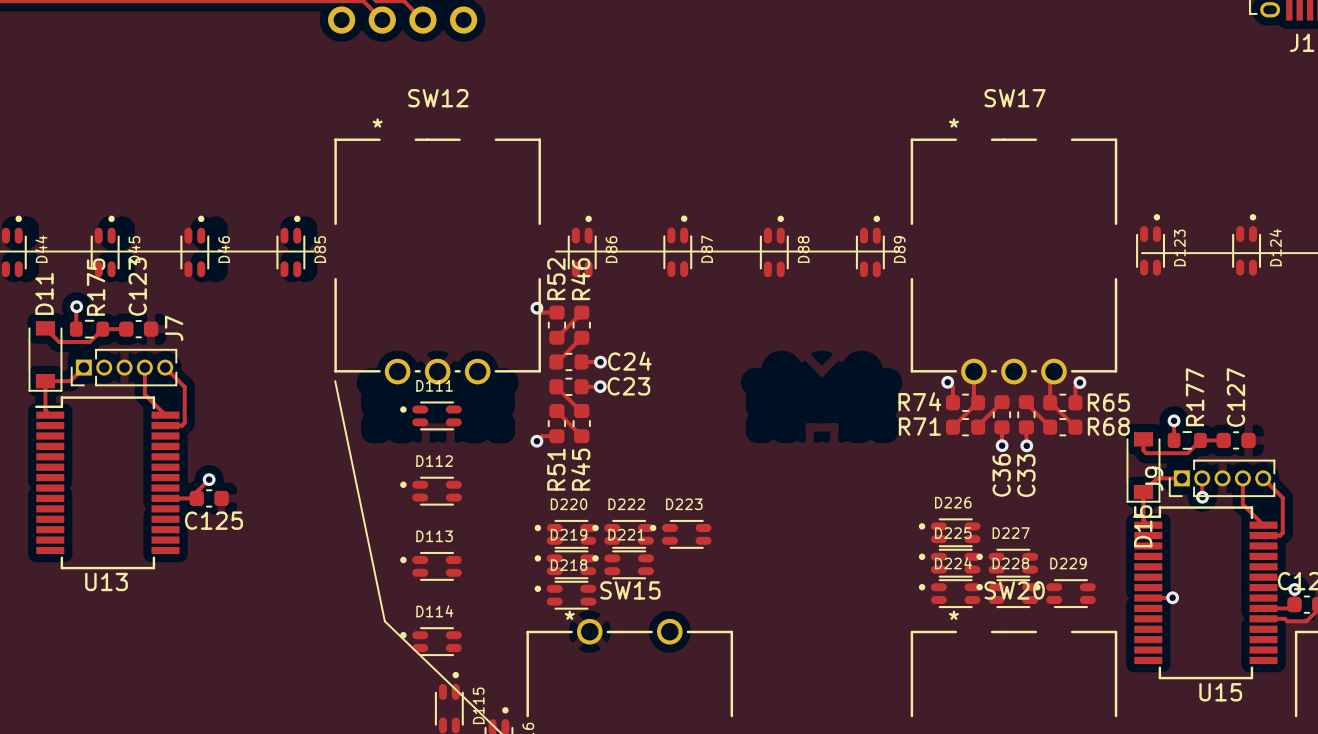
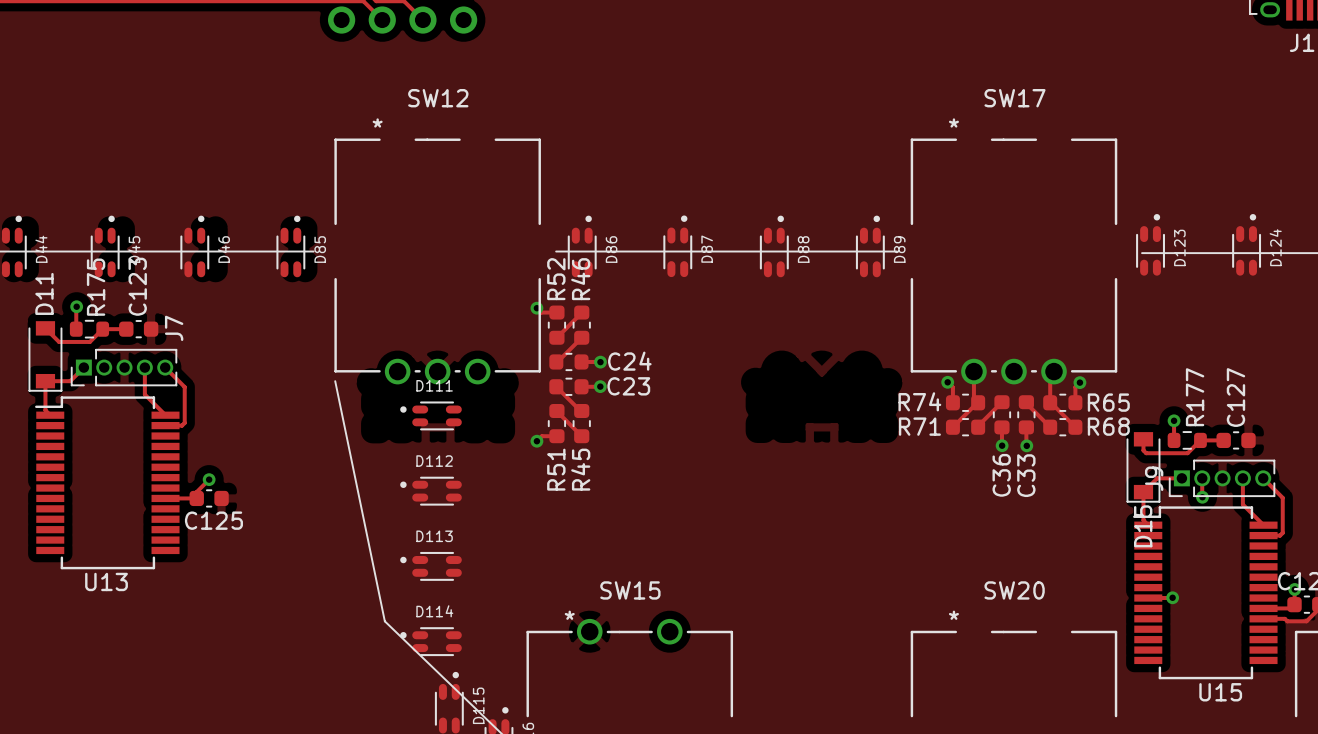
D226: (949, 532) -> none
D220: (565, 534) -> none
D222: (623, 534) -> none
D223: (680, 534) -> none
D225: (949, 563) -> none
D227: (1007, 563) -> none
D219: (565, 564) -> none
D221: (623, 564) -> none
D224: (949, 593) -> none
D228: (1007, 593) -> none
D229: (1064, 593) -> none
D218: (565, 595) -> none

